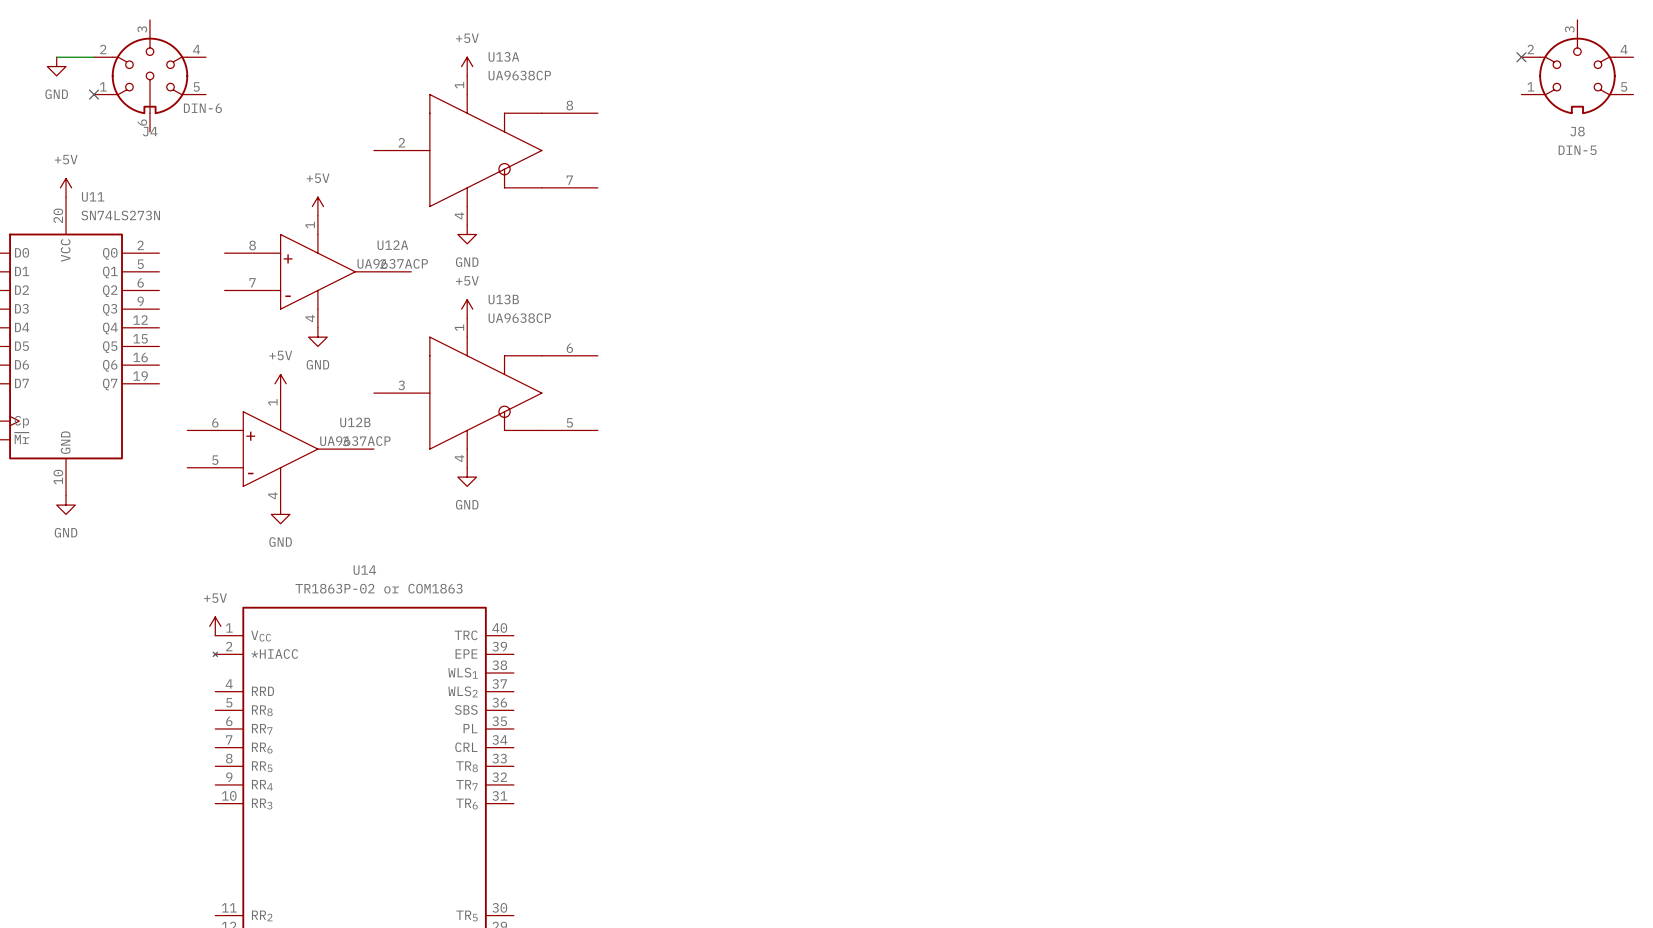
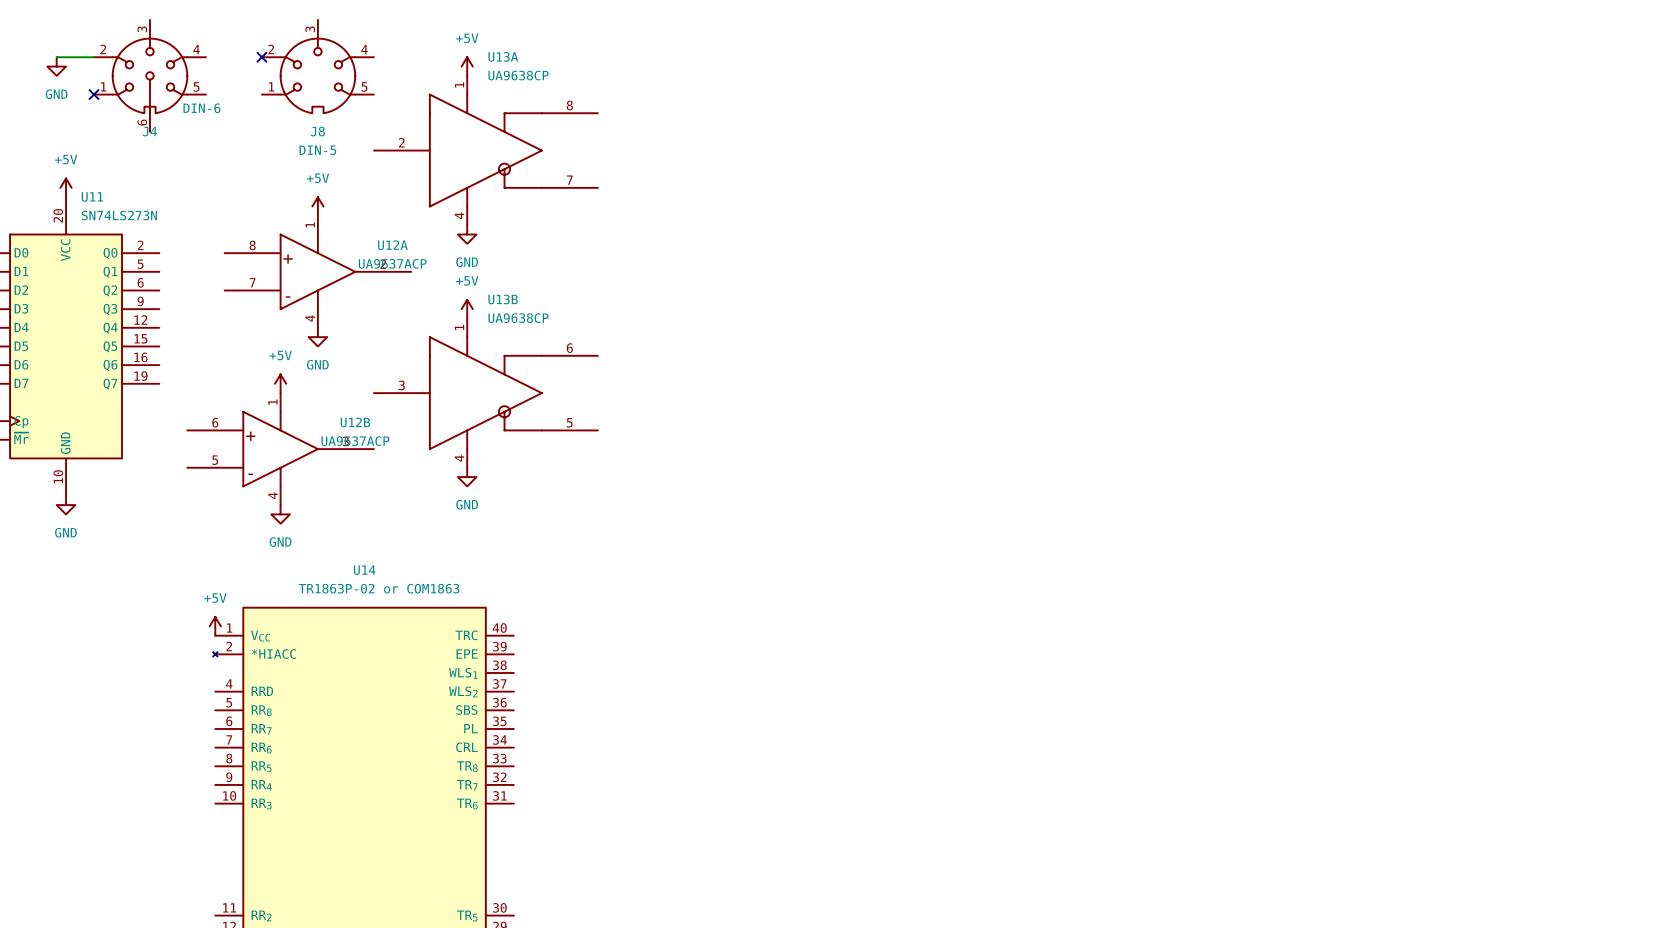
no-connect mark: none -> (261, 57)
no-connect mark: (1521, 57) -> none
J8 position: (1577, 67) -> (317, 67)

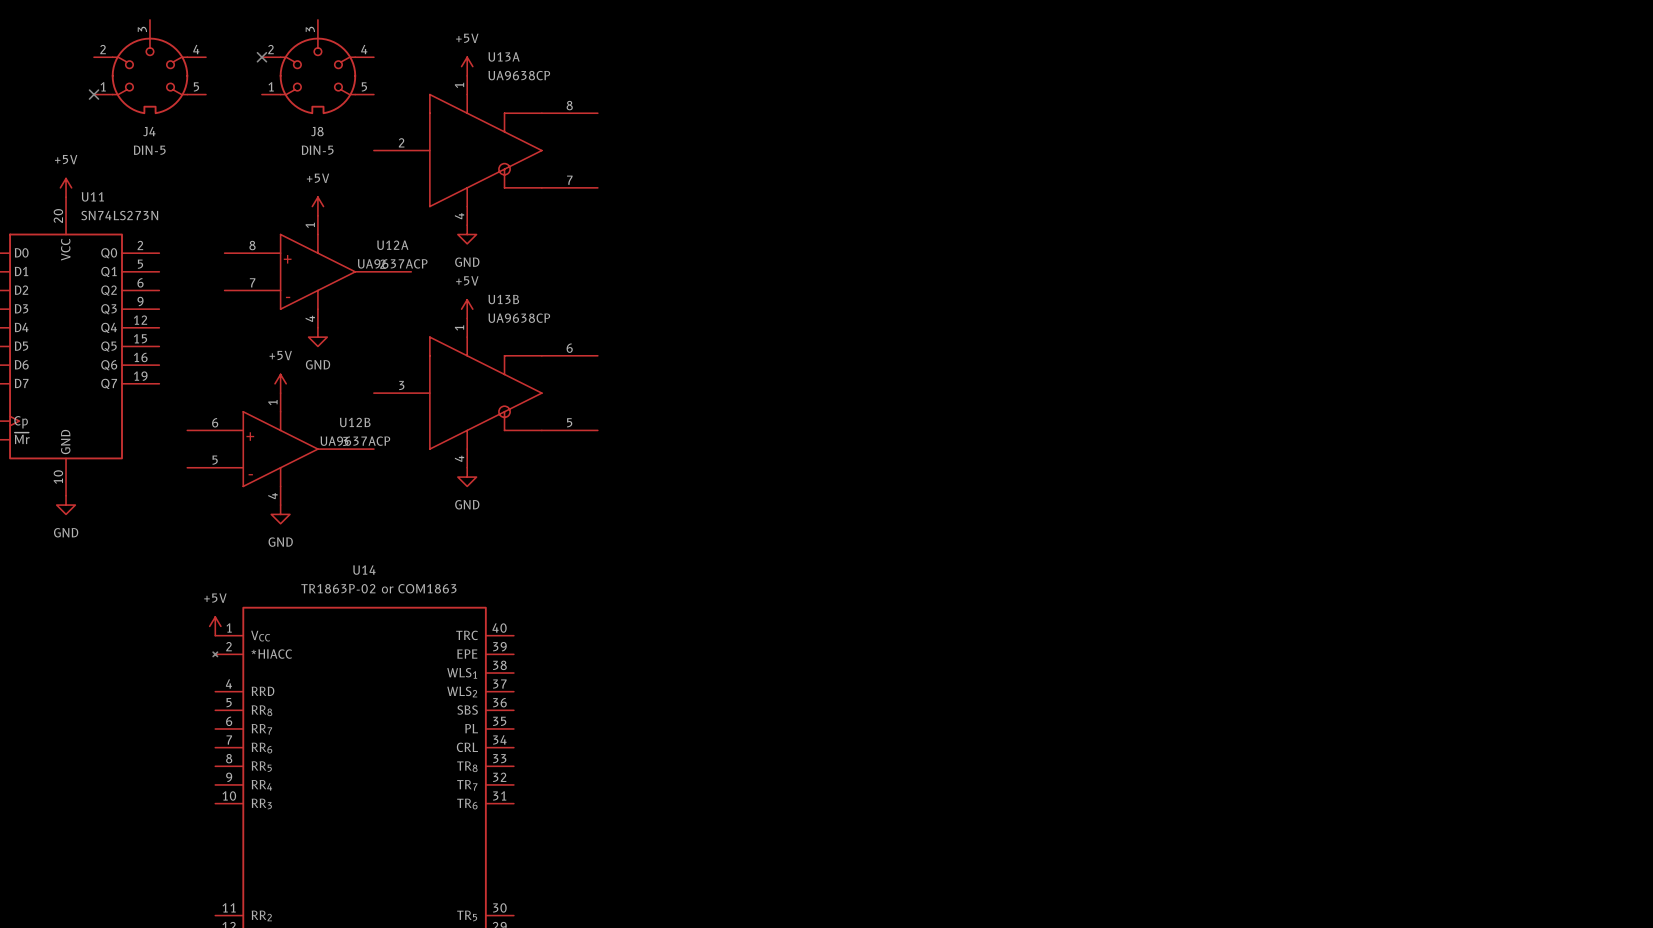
J4 symbol: [94, 19, 206, 132] -> [94, 19, 206, 115]
wire: (56, 57) (94, 57) -> none
power symbol: GND (56, 66) -> none
J4 value: DIN-6 (201, 108) -> DIN-5 (149, 150)

